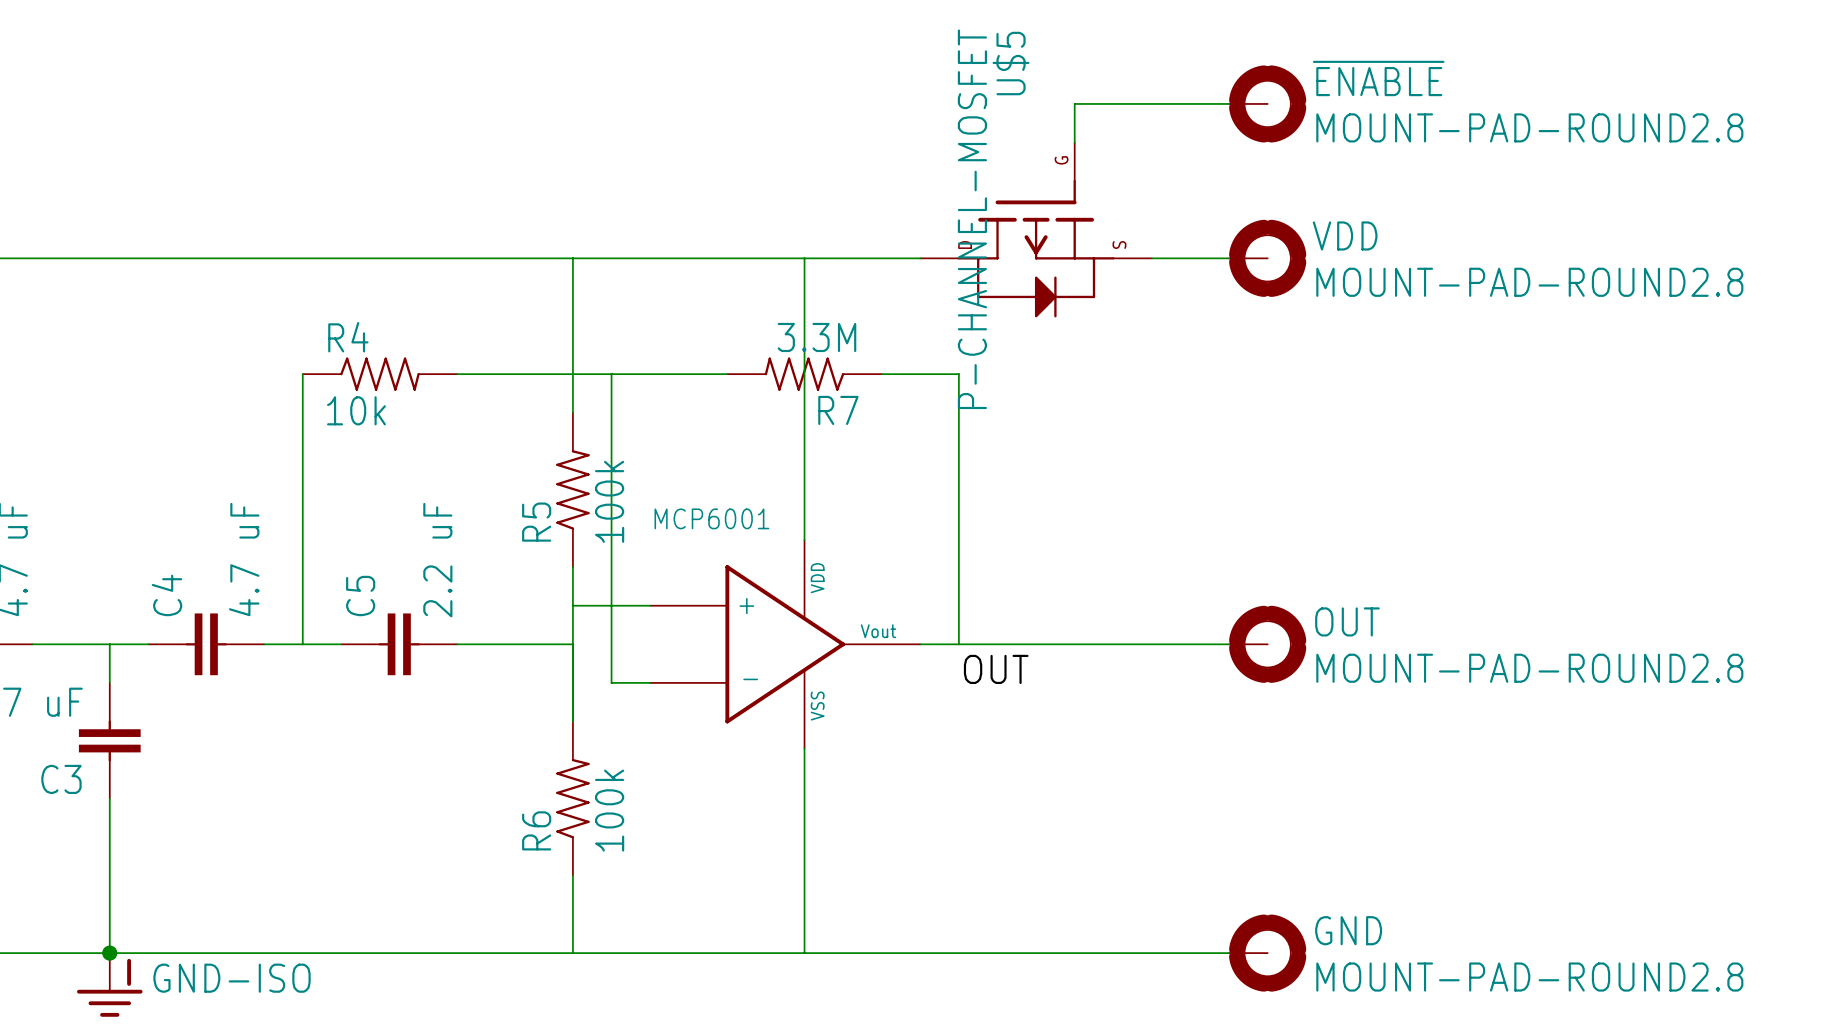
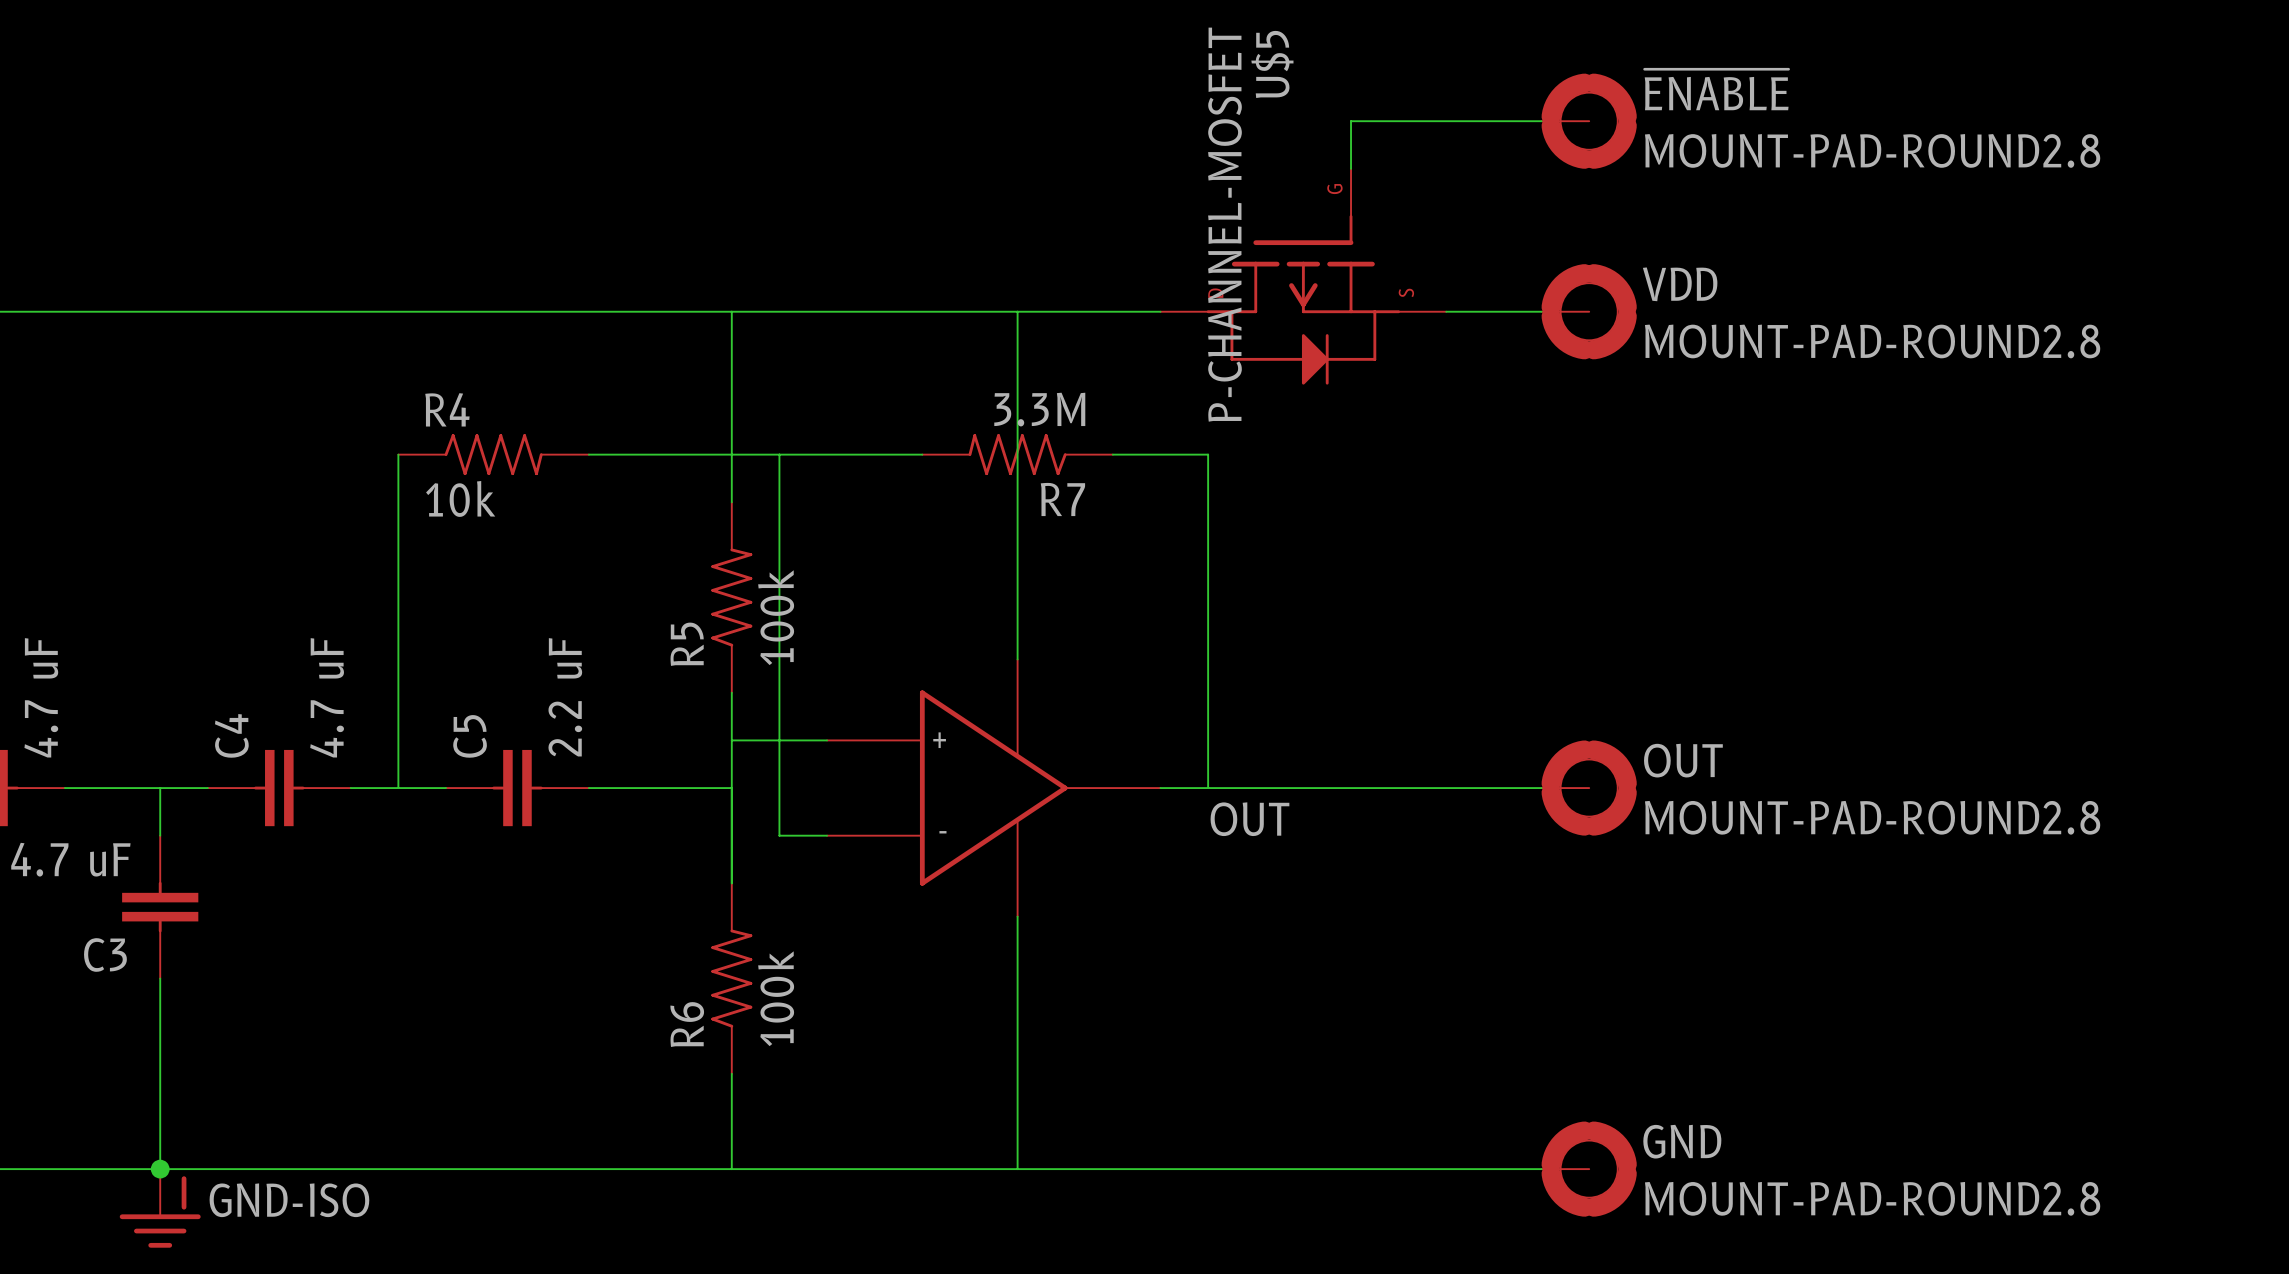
part text: MCP6001 (711, 518) -> none
part text: VDD (817, 578) -> none
part text: Vout (878, 631) -> none
part text: VSS (817, 706) -> none

